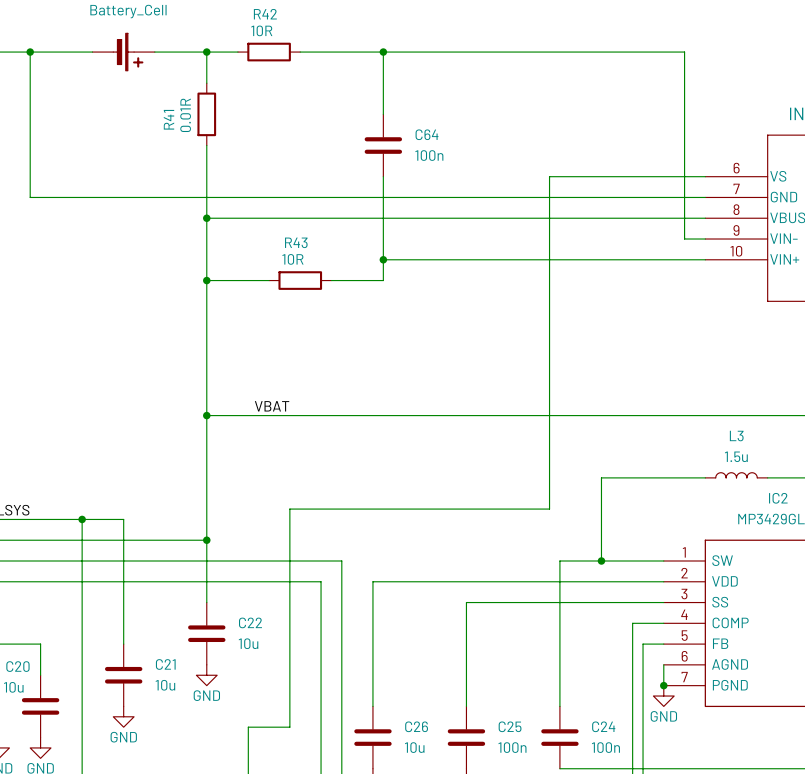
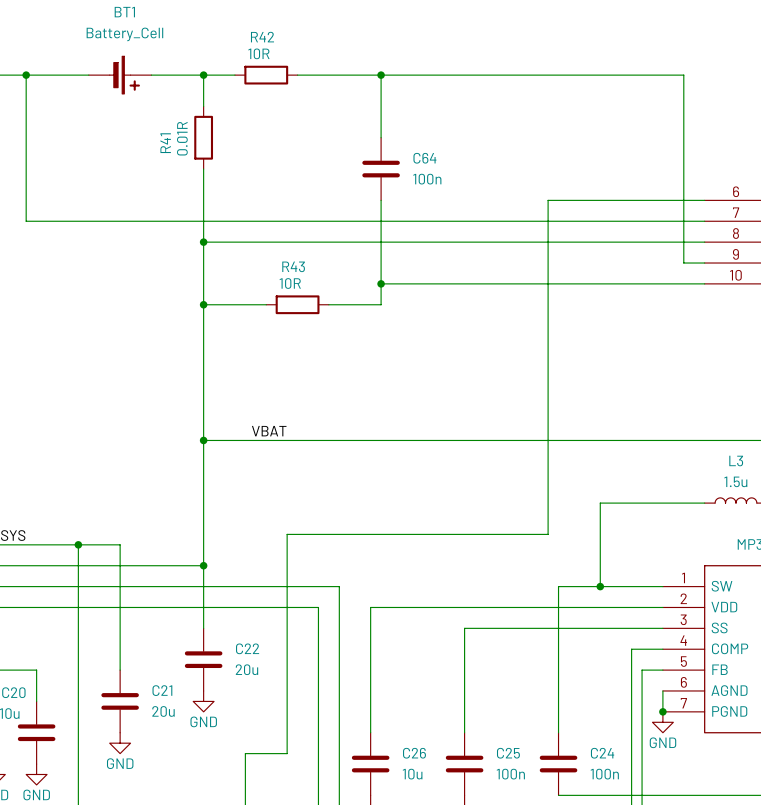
C22 value: 10u (248, 643) -> 20u (246, 669)
C21 value: 10u (165, 685) -> 20u (163, 711)

